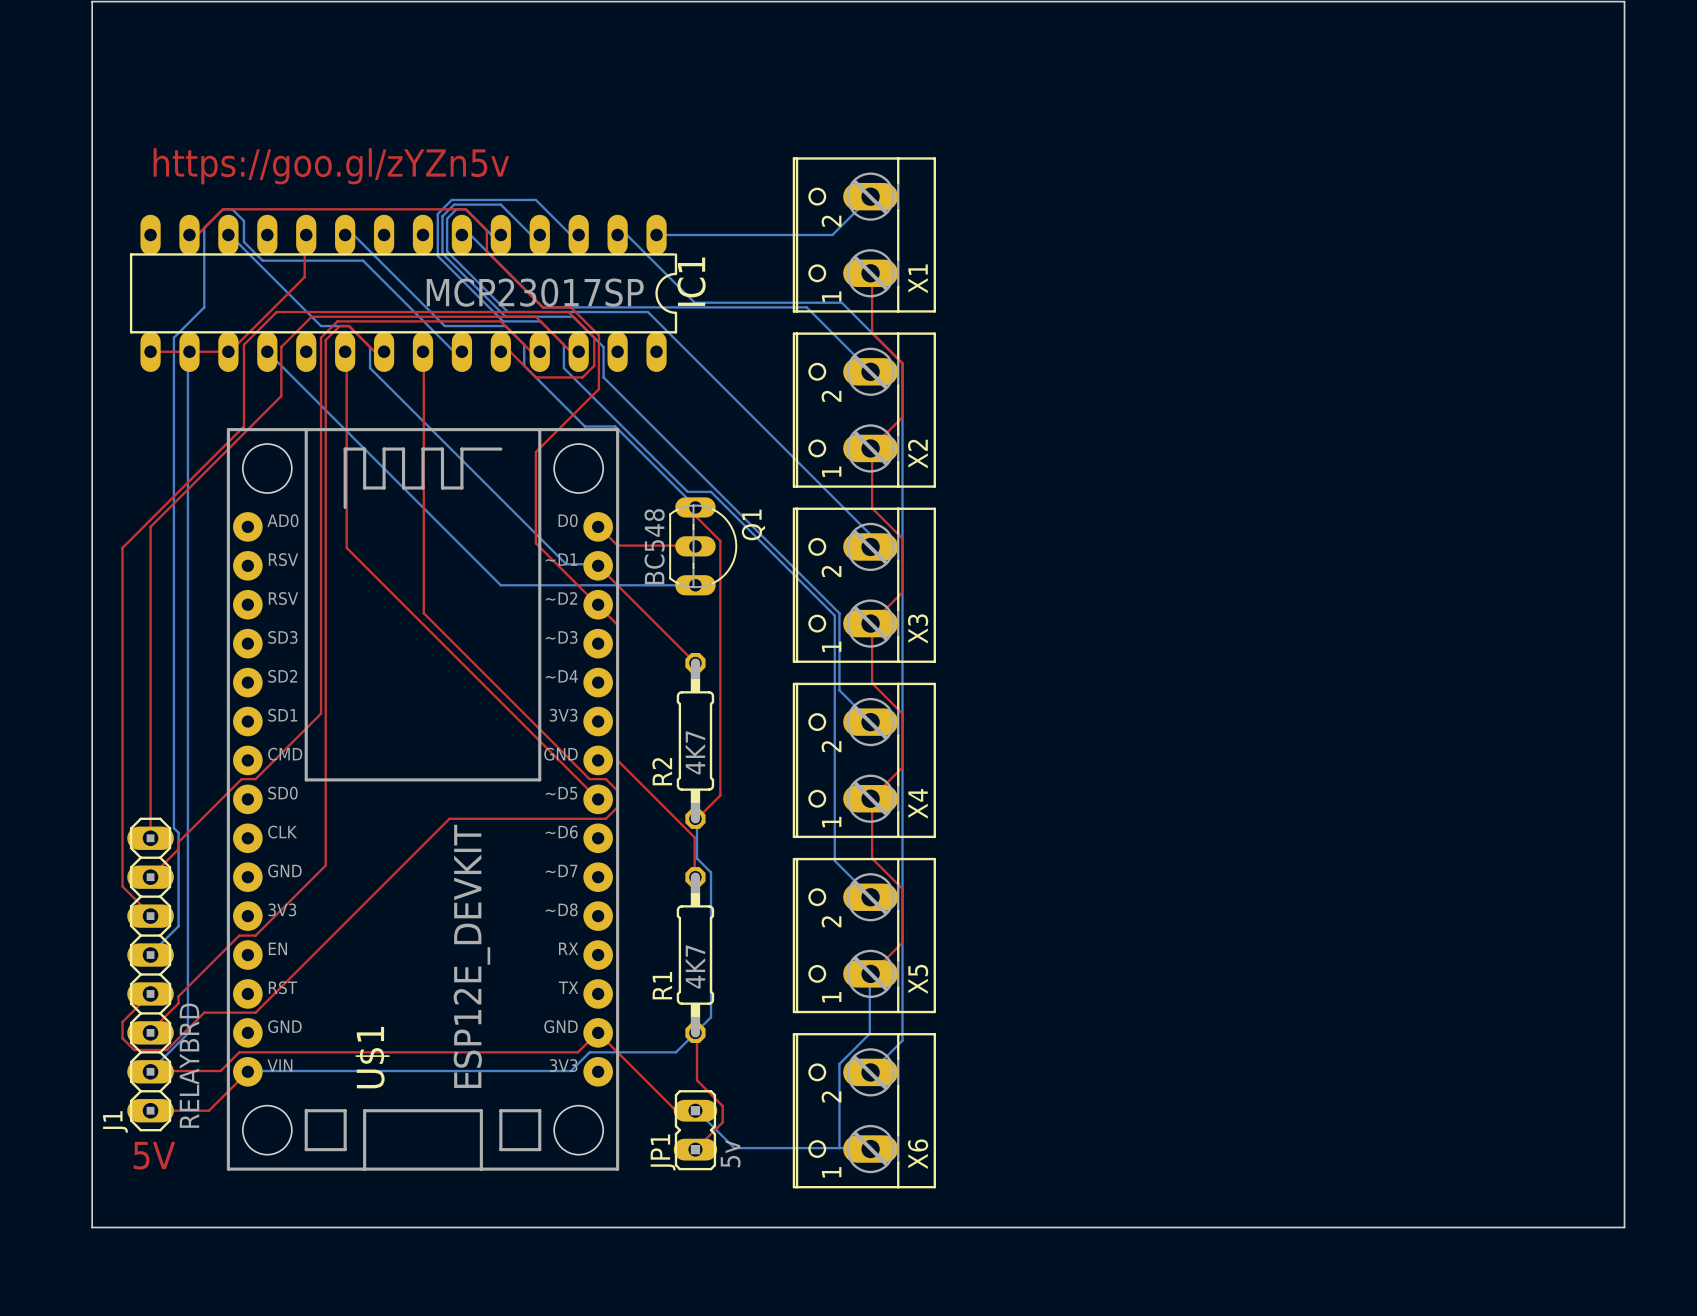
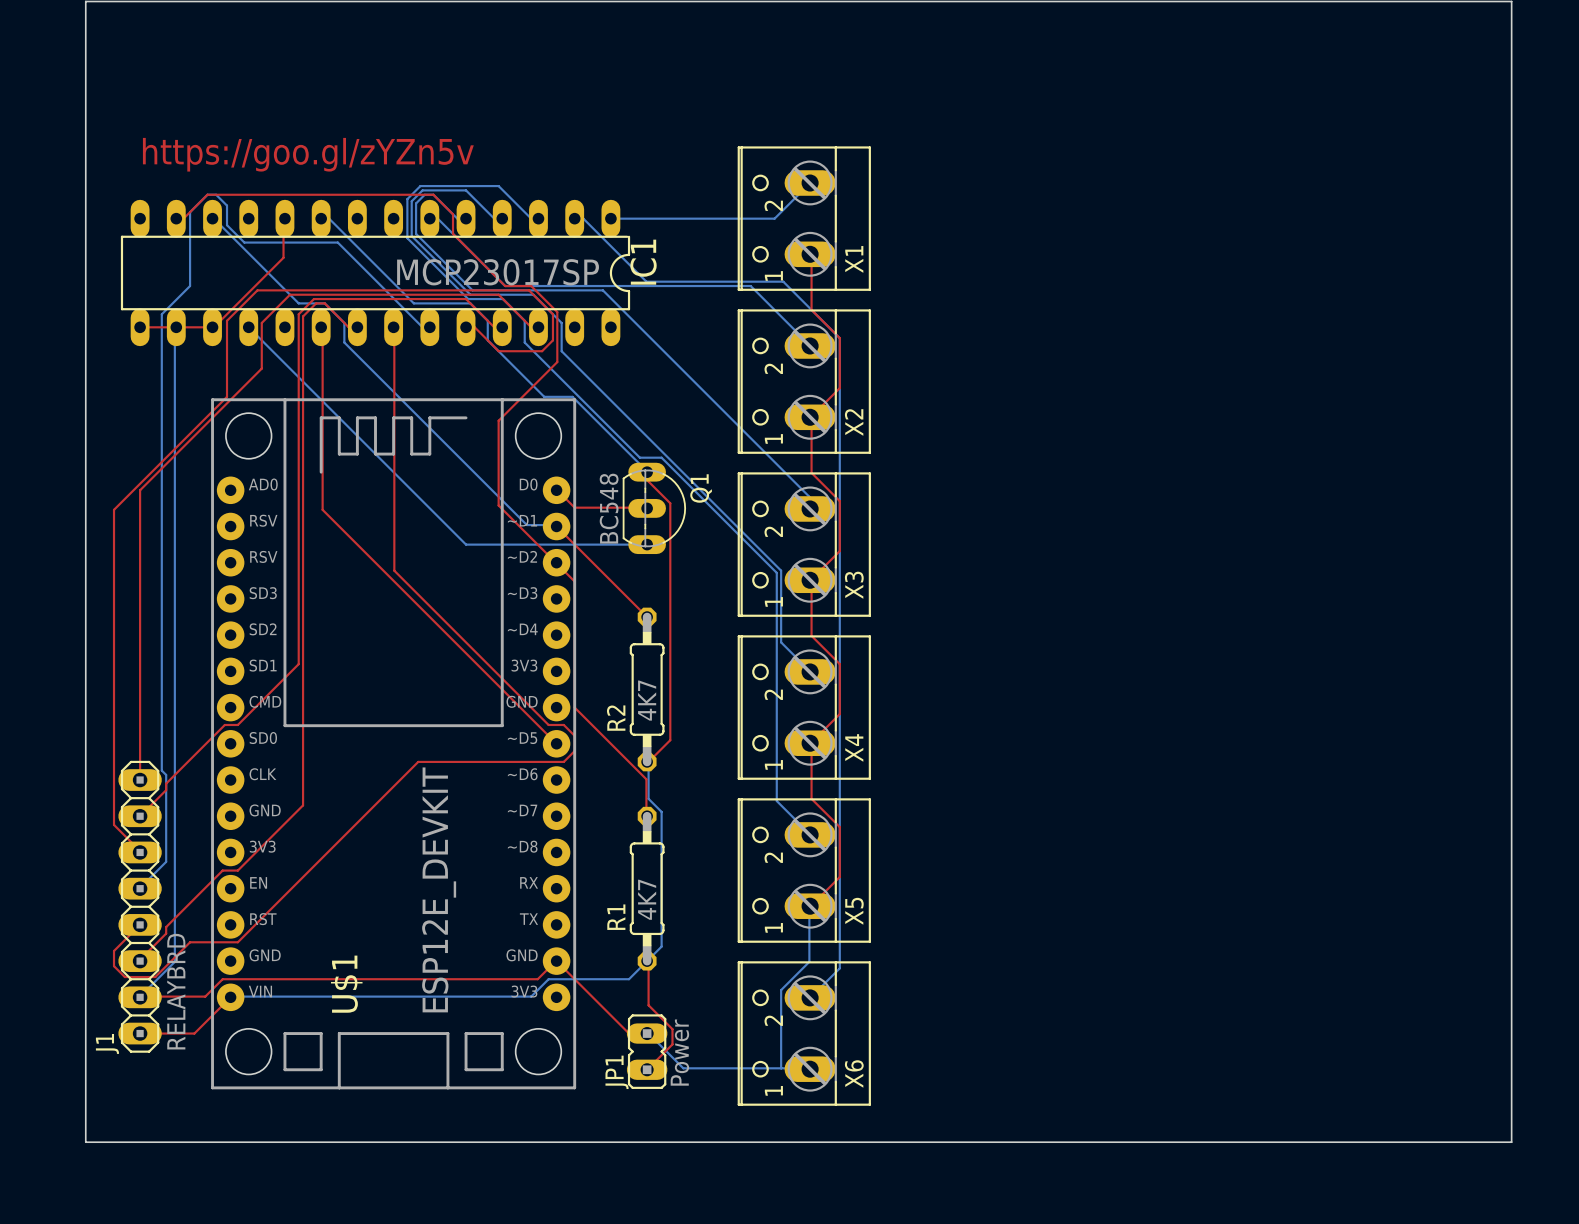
JP1 value: 5v (730, 1153) -> Power (679, 1052)
text: 5V (154, 1155) -> none

